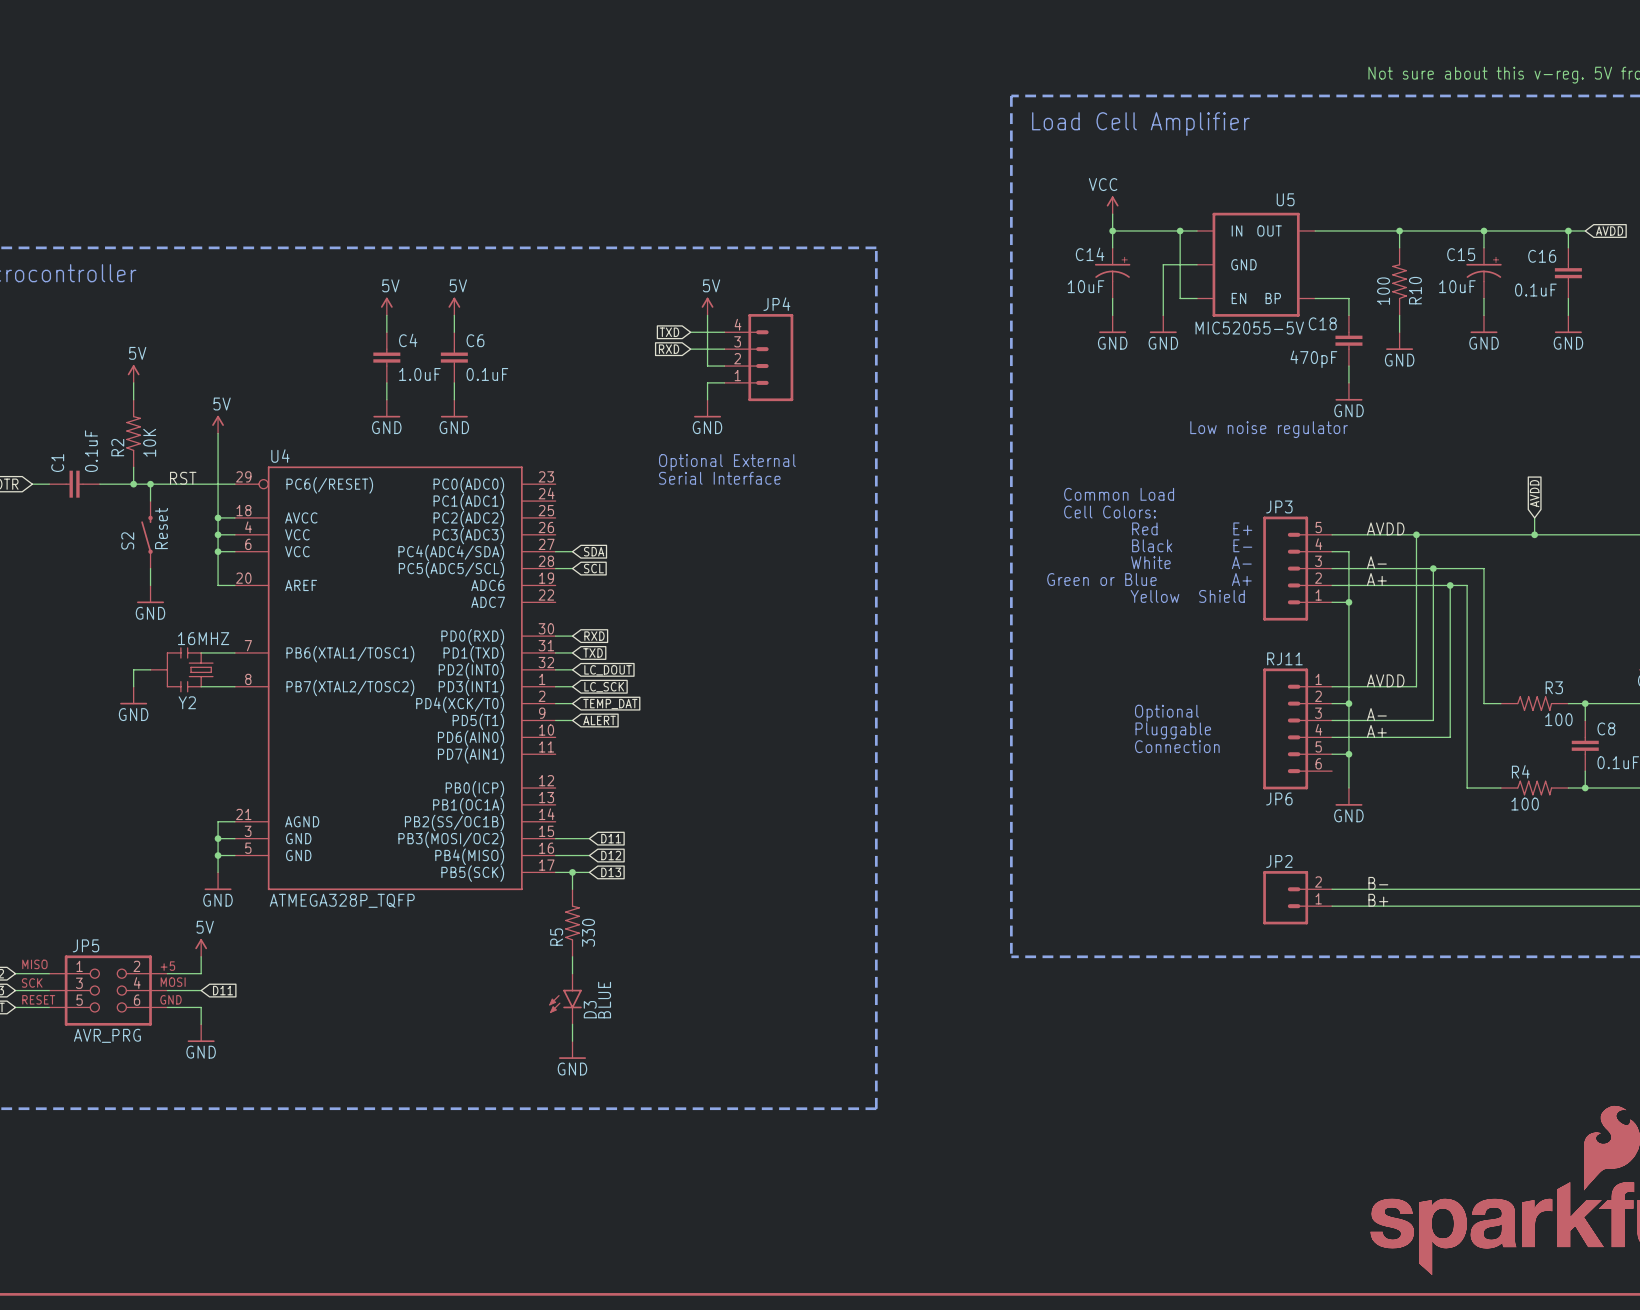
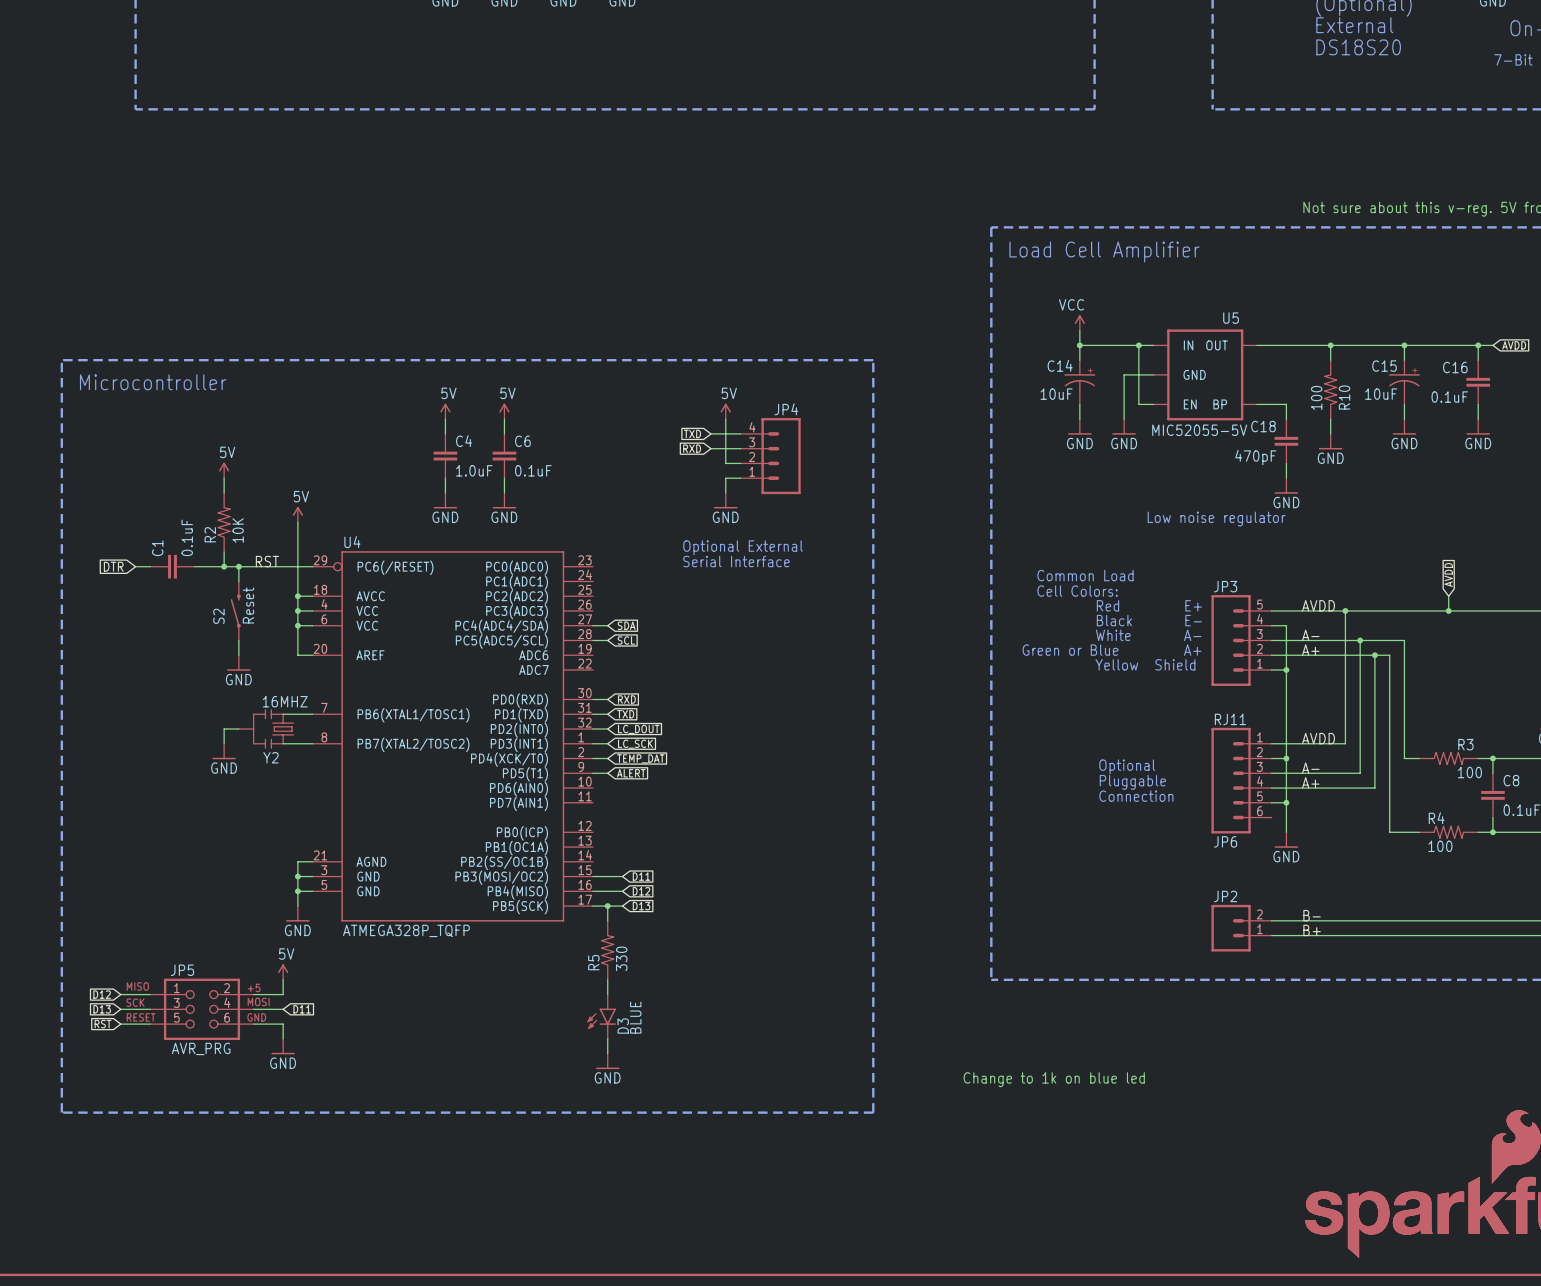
text: none -> Change to 1k on blue led (1054, 1079)

